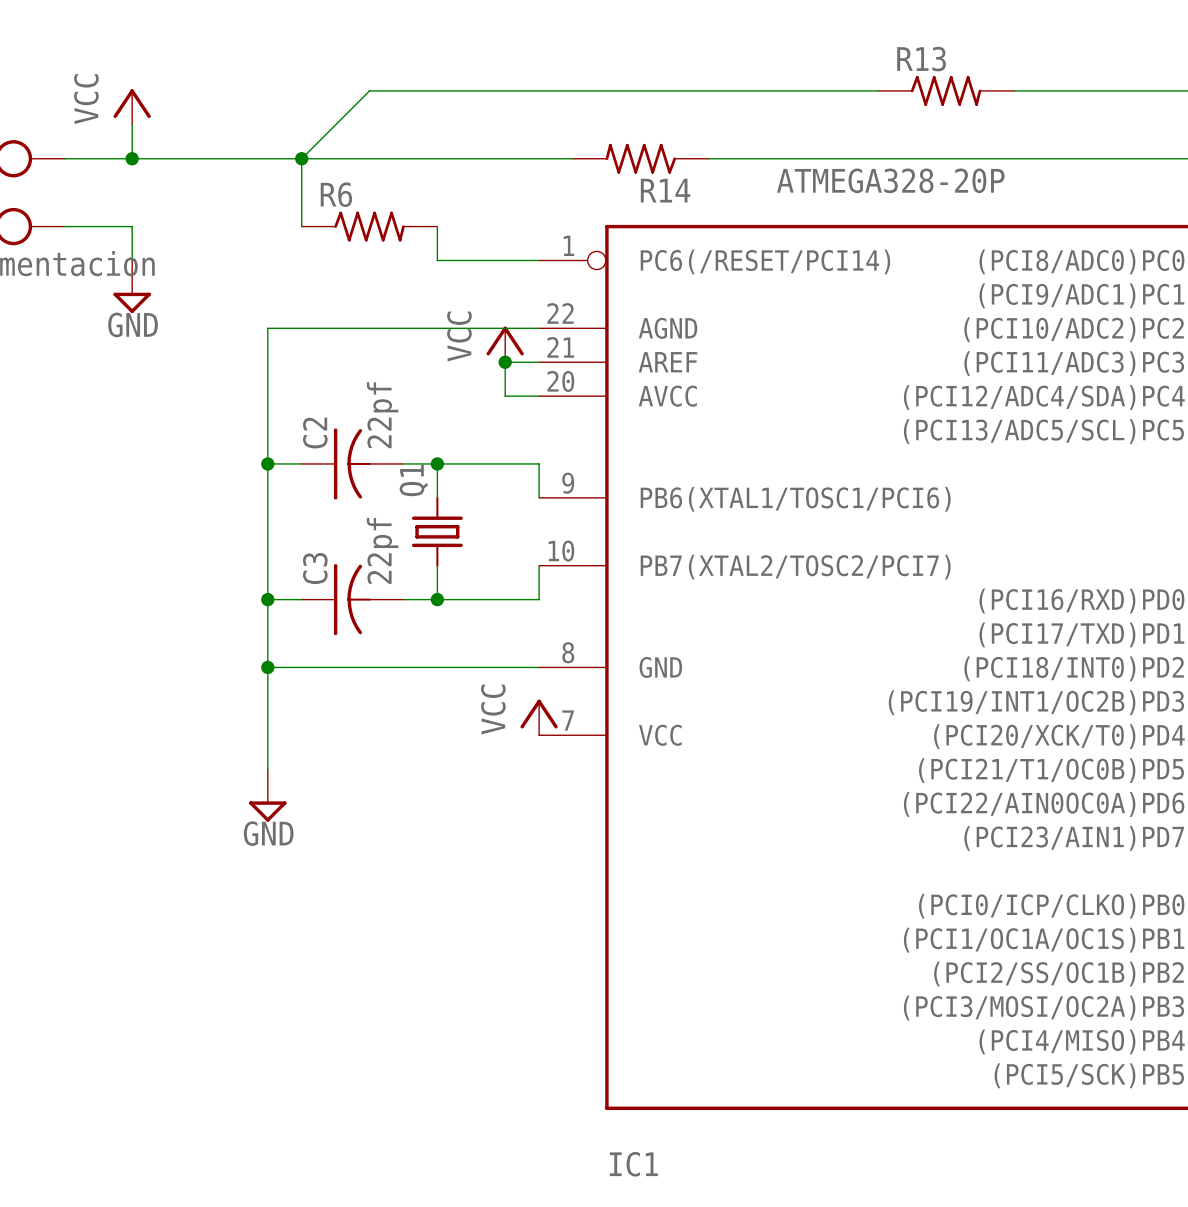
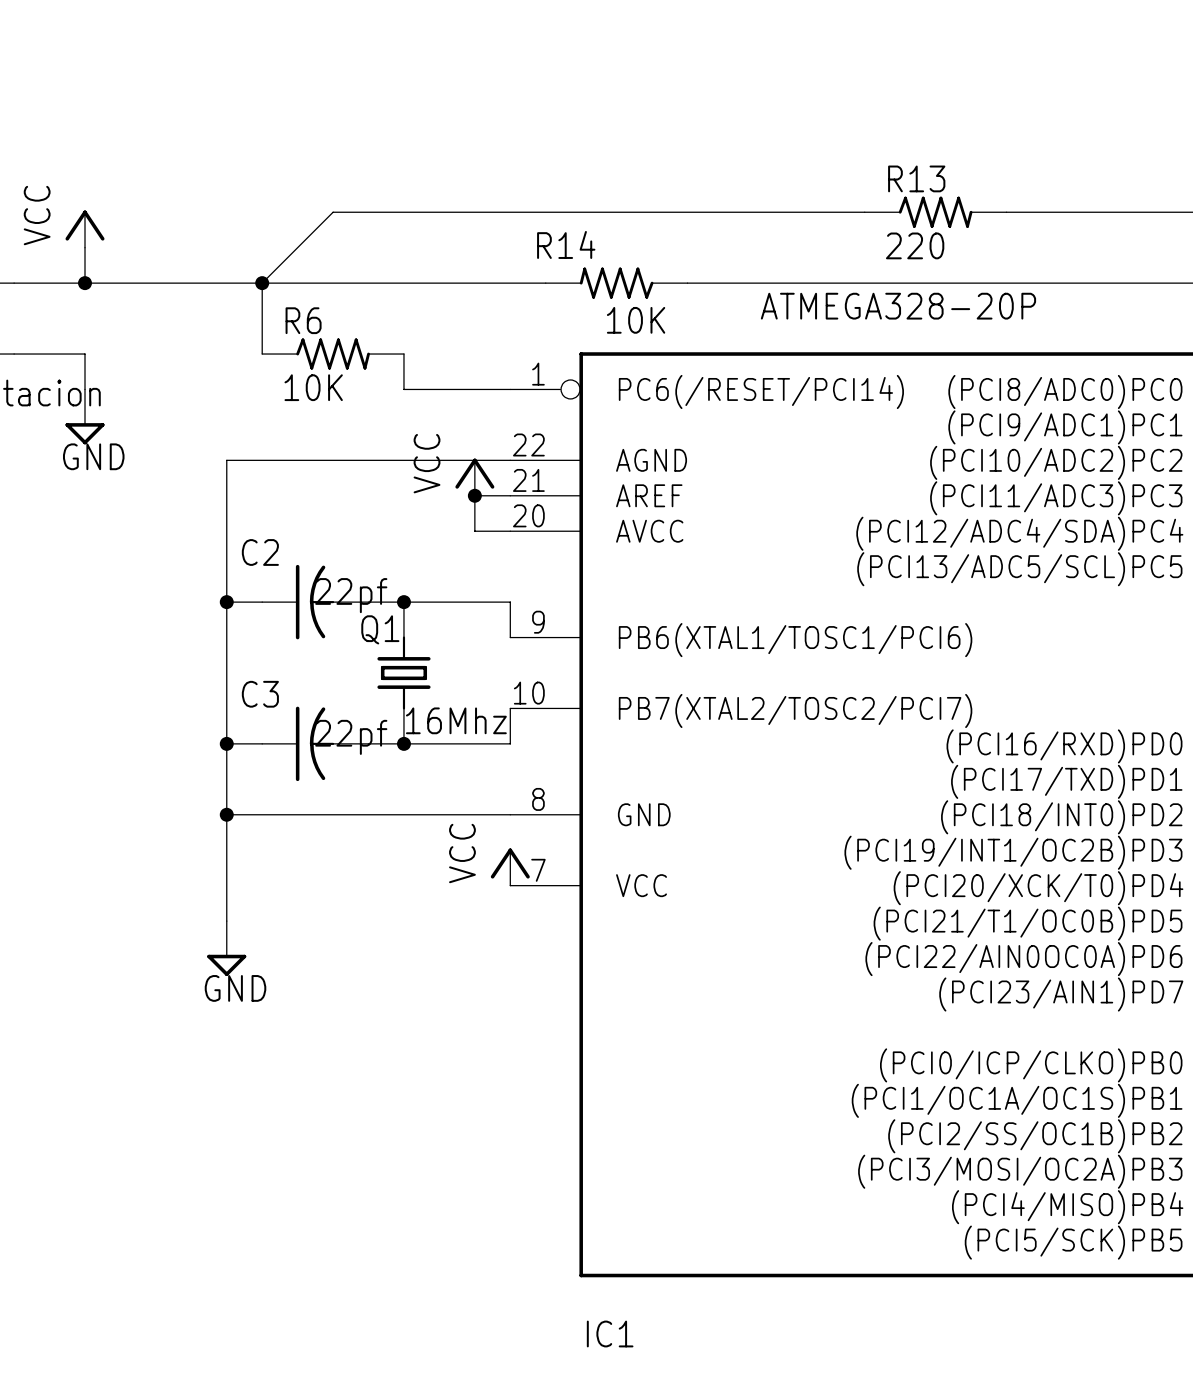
R13 value: none -> 220 (915, 245)
R14 name position: R14 (665, 190) -> R14 (566, 244)
R14 value: none -> 10K (636, 320)
R6 value: none -> 10K (313, 387)
C2 value rotation: 0° (382, 415) -> 90° clockwise (351, 595)
C2 name rotation: 0° (315, 433) -> 90° clockwise (260, 552)
Q1 name rotation: 0° (413, 480) -> 90° clockwise (380, 629)
C3 value rotation: 0° (382, 550) -> 90° clockwise (351, 737)
C3 name rotation: 0° (315, 568) -> 90° clockwise (260, 694)
Q1 value: none -> 16Mhz (456, 720)

